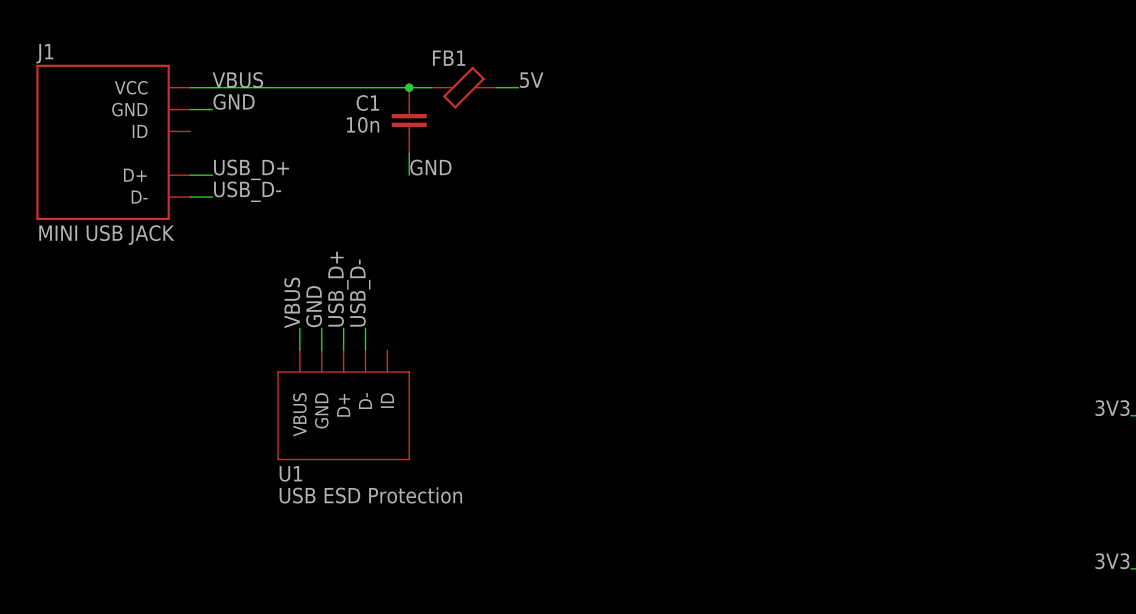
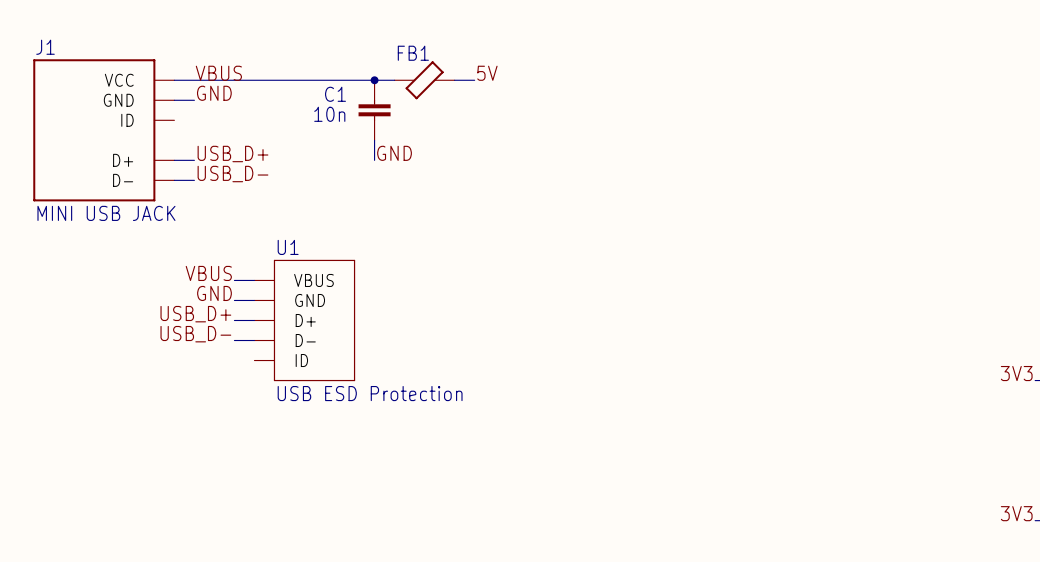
label rotation: 0° (338, 289) -> 90° clockwise (195, 314)
label position: USB_D+ (338, 289) -> USB_D+ (195, 314)
label rotation: 0° (360, 293) -> 90° clockwise (195, 334)
label position: USB_D- (360, 293) -> USB_D- (195, 334)
label rotation: 0° (292, 302) -> 90° clockwise (208, 273)
label position: VBUS (292, 302) -> VBUS (208, 273)
wire: none -> (234, 280) (254, 280)
label rotation: 0° (314, 306) -> 90° clockwise (214, 293)
label position: GND (314, 306) -> GND (214, 293)
wire: none -> (234, 300) (254, 300)
wire: (321, 328) (321, 350) -> none
wire: (343, 328) (343, 350) -> none
wire: (365, 328) (365, 350) -> none
wire: none -> (234, 320) (254, 320)
U1 symbol: [277, 350, 410, 461] -> [254, 259, 356, 382]
wire: none -> (234, 340) (254, 340)
U1 name position: U1 (290, 473) -> U1 (288, 247)

